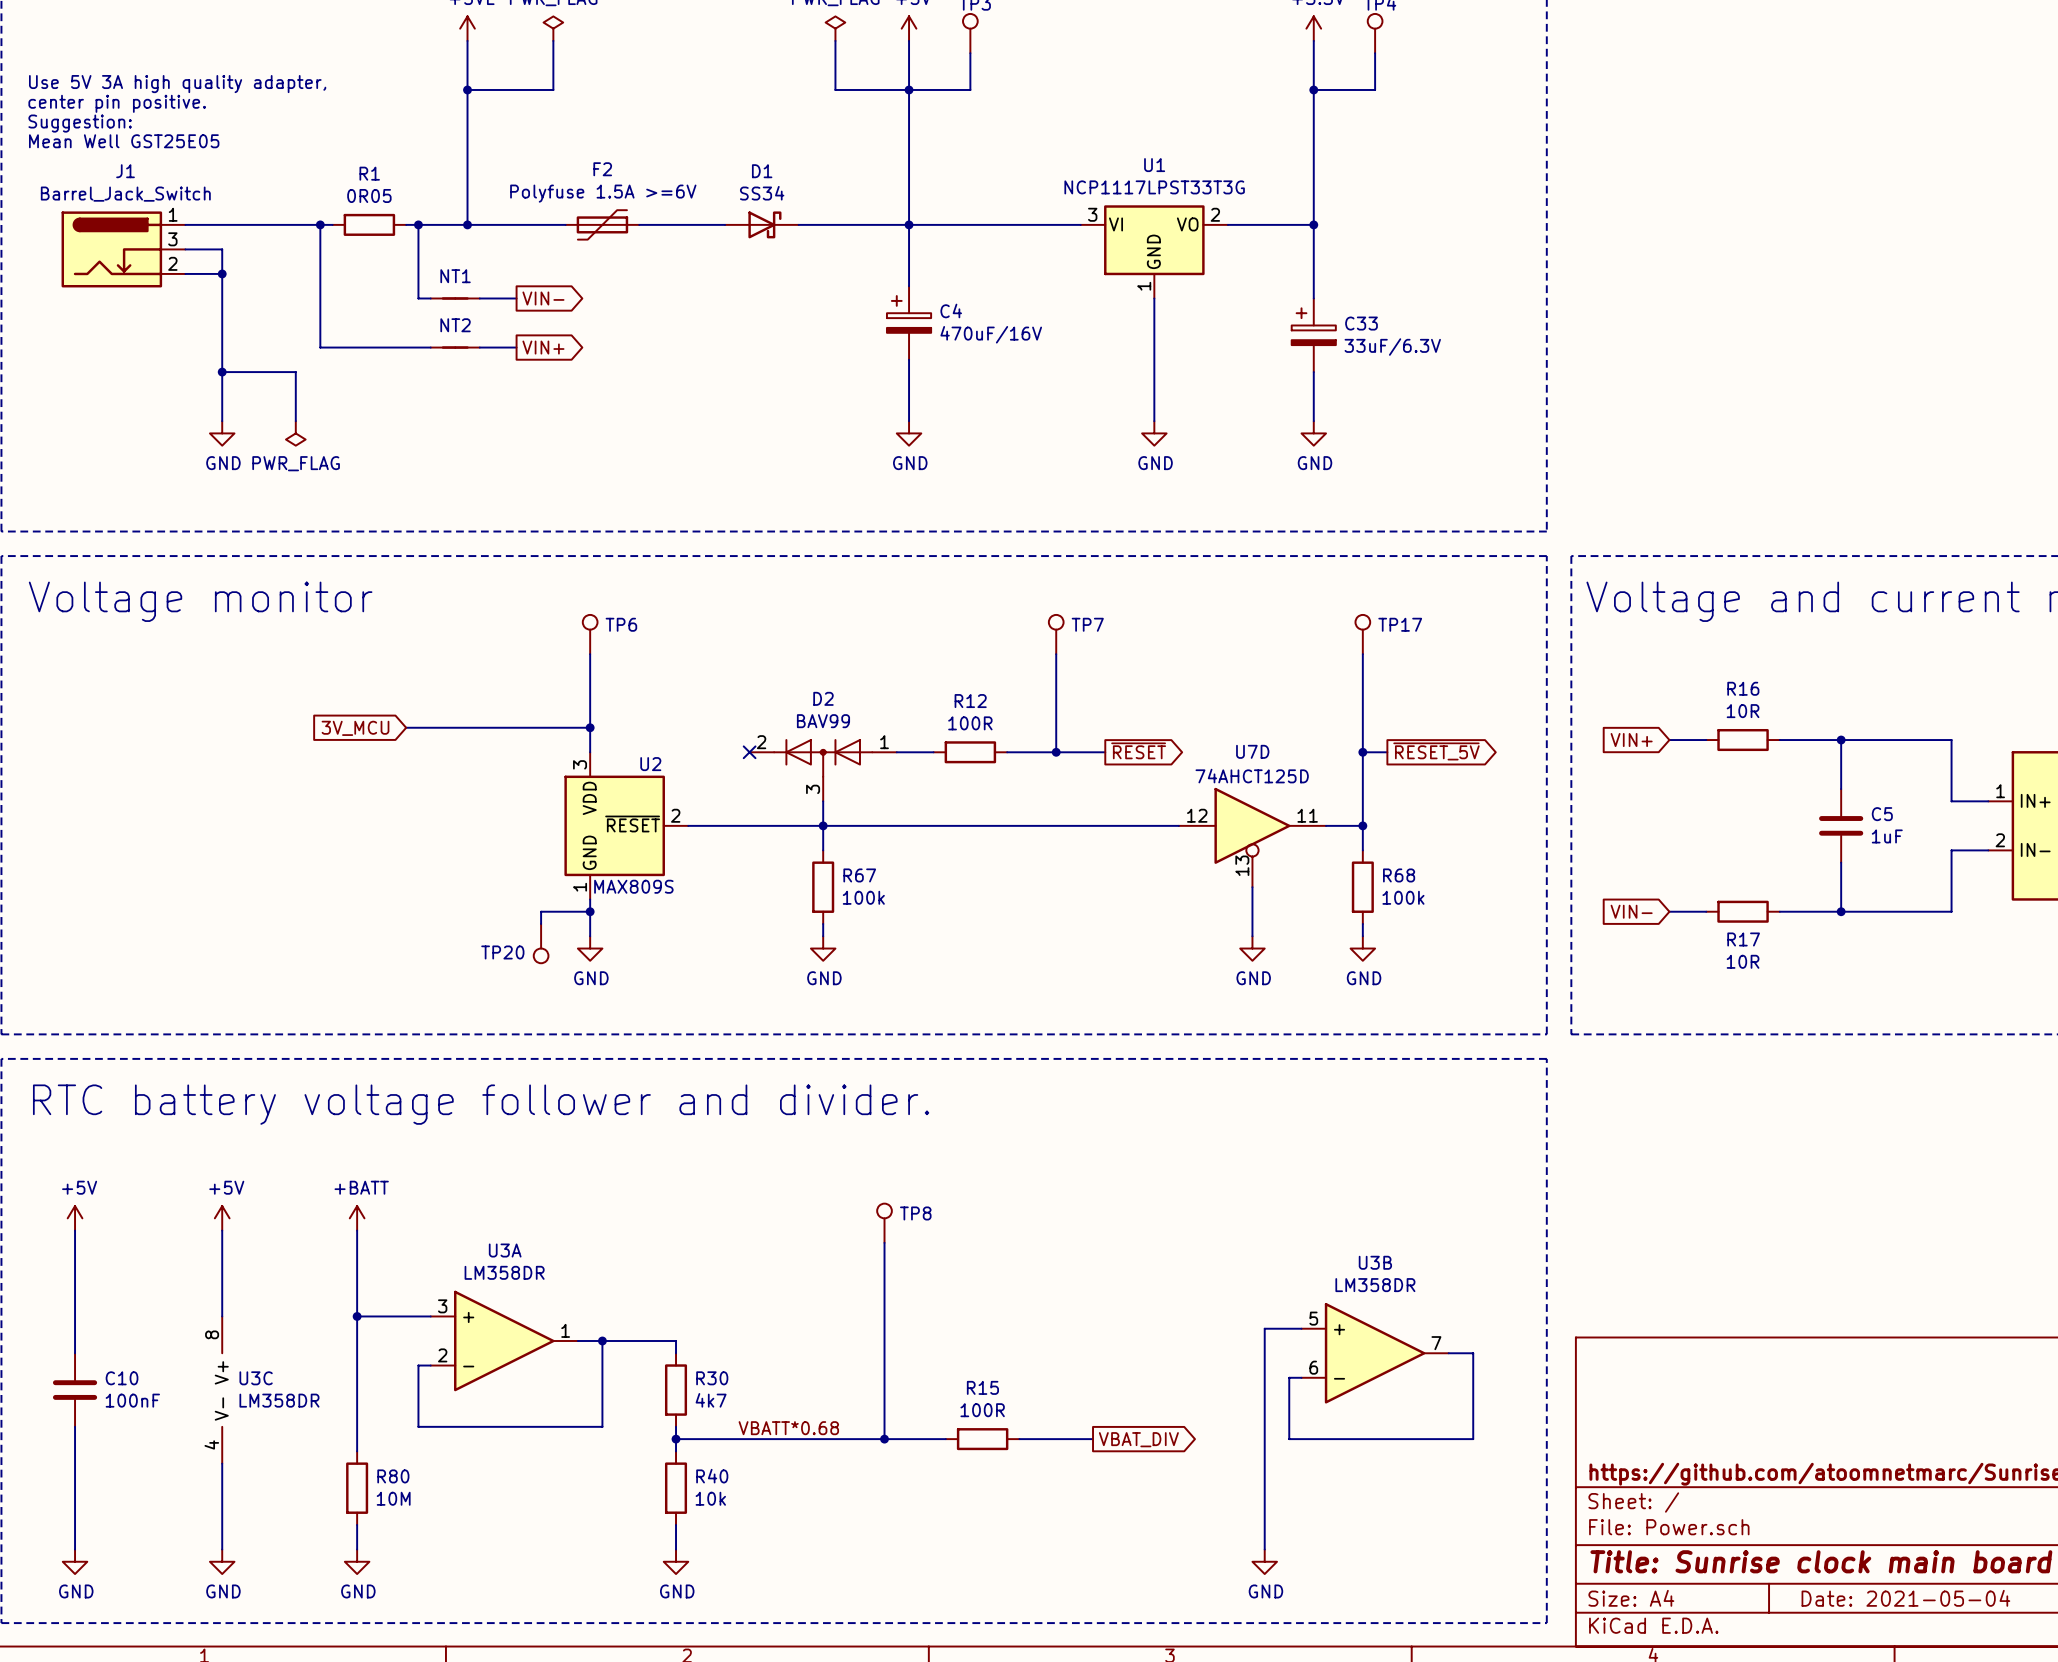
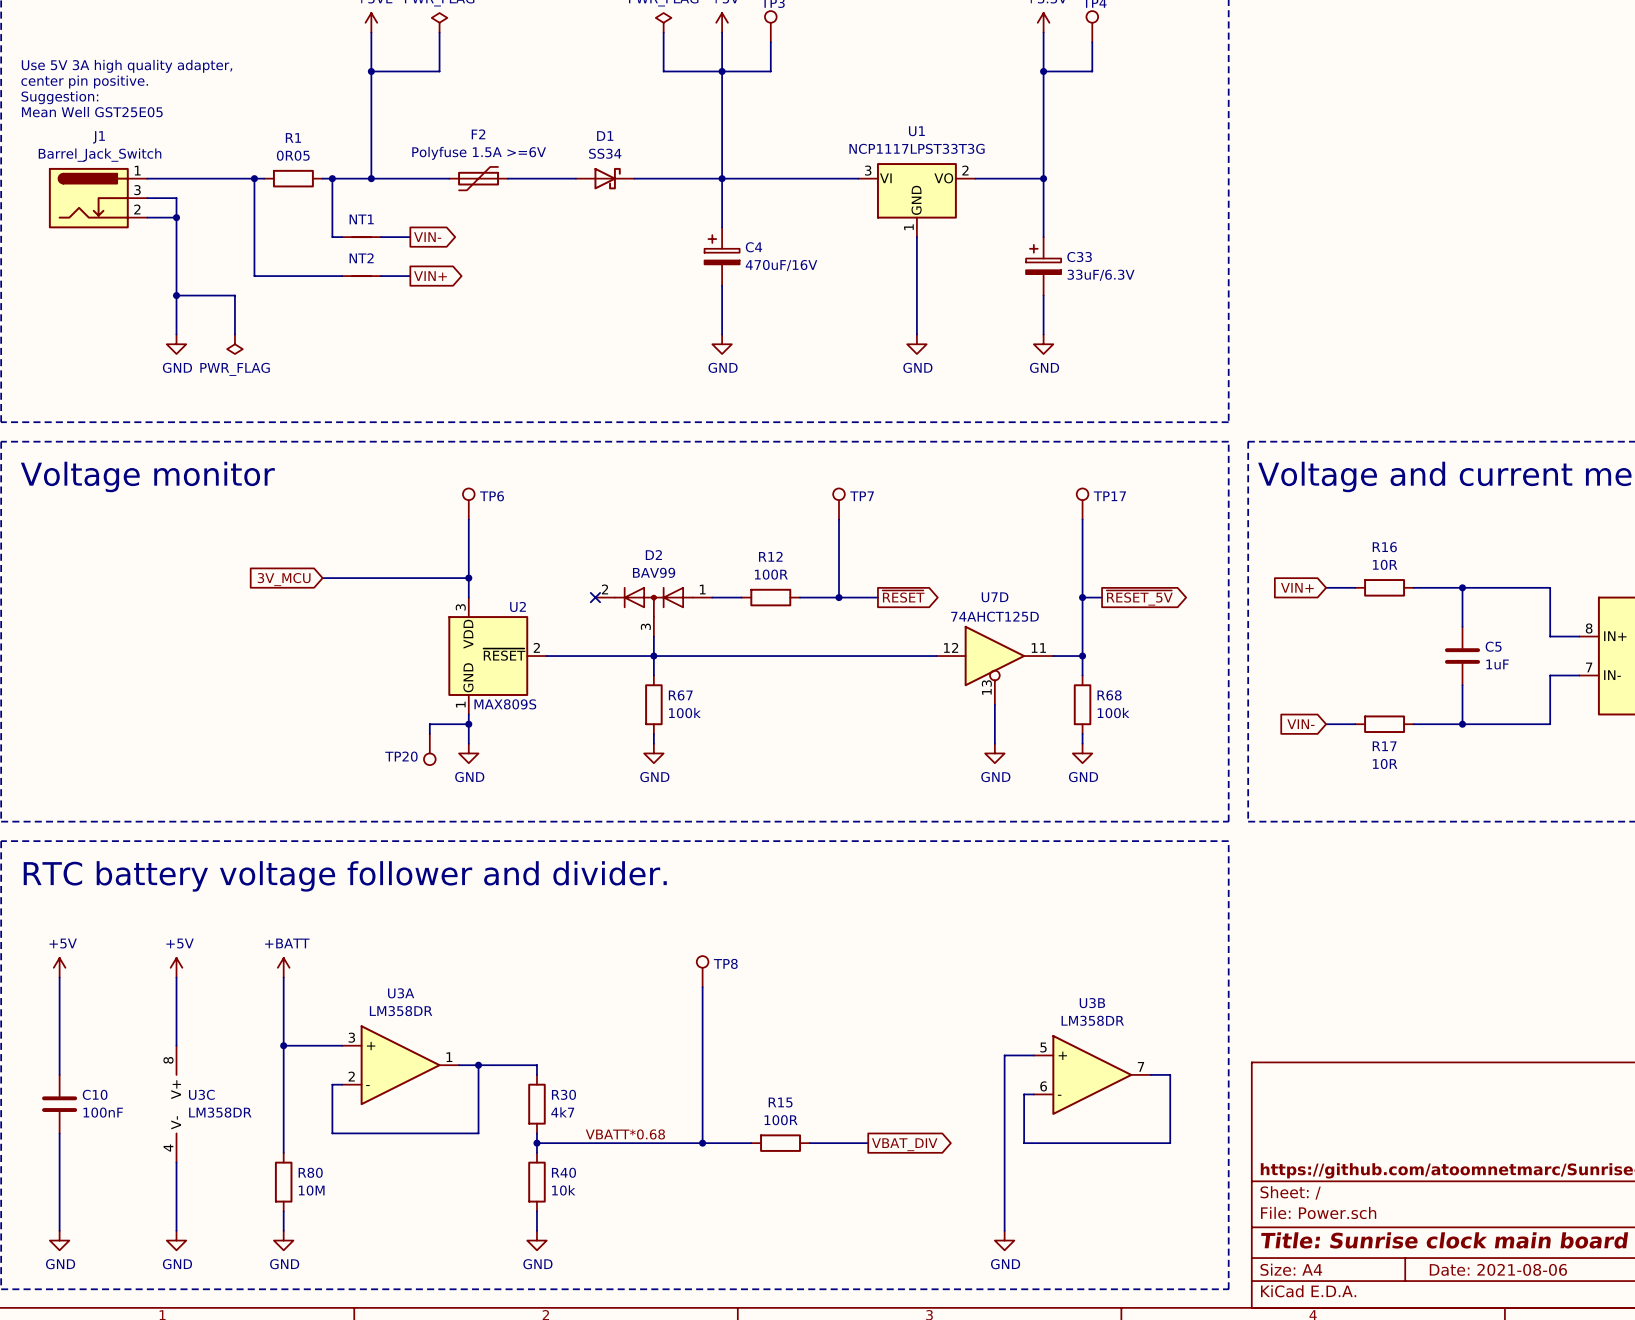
part pin number: 1 (2000, 791) -> 8 (1589, 628)
part pin number: 2 (2000, 840) -> 7 (1589, 667)
title block: Date: 2021-05-04 (1905, 1598) -> Date: 2021-08-06 (1498, 1269)

